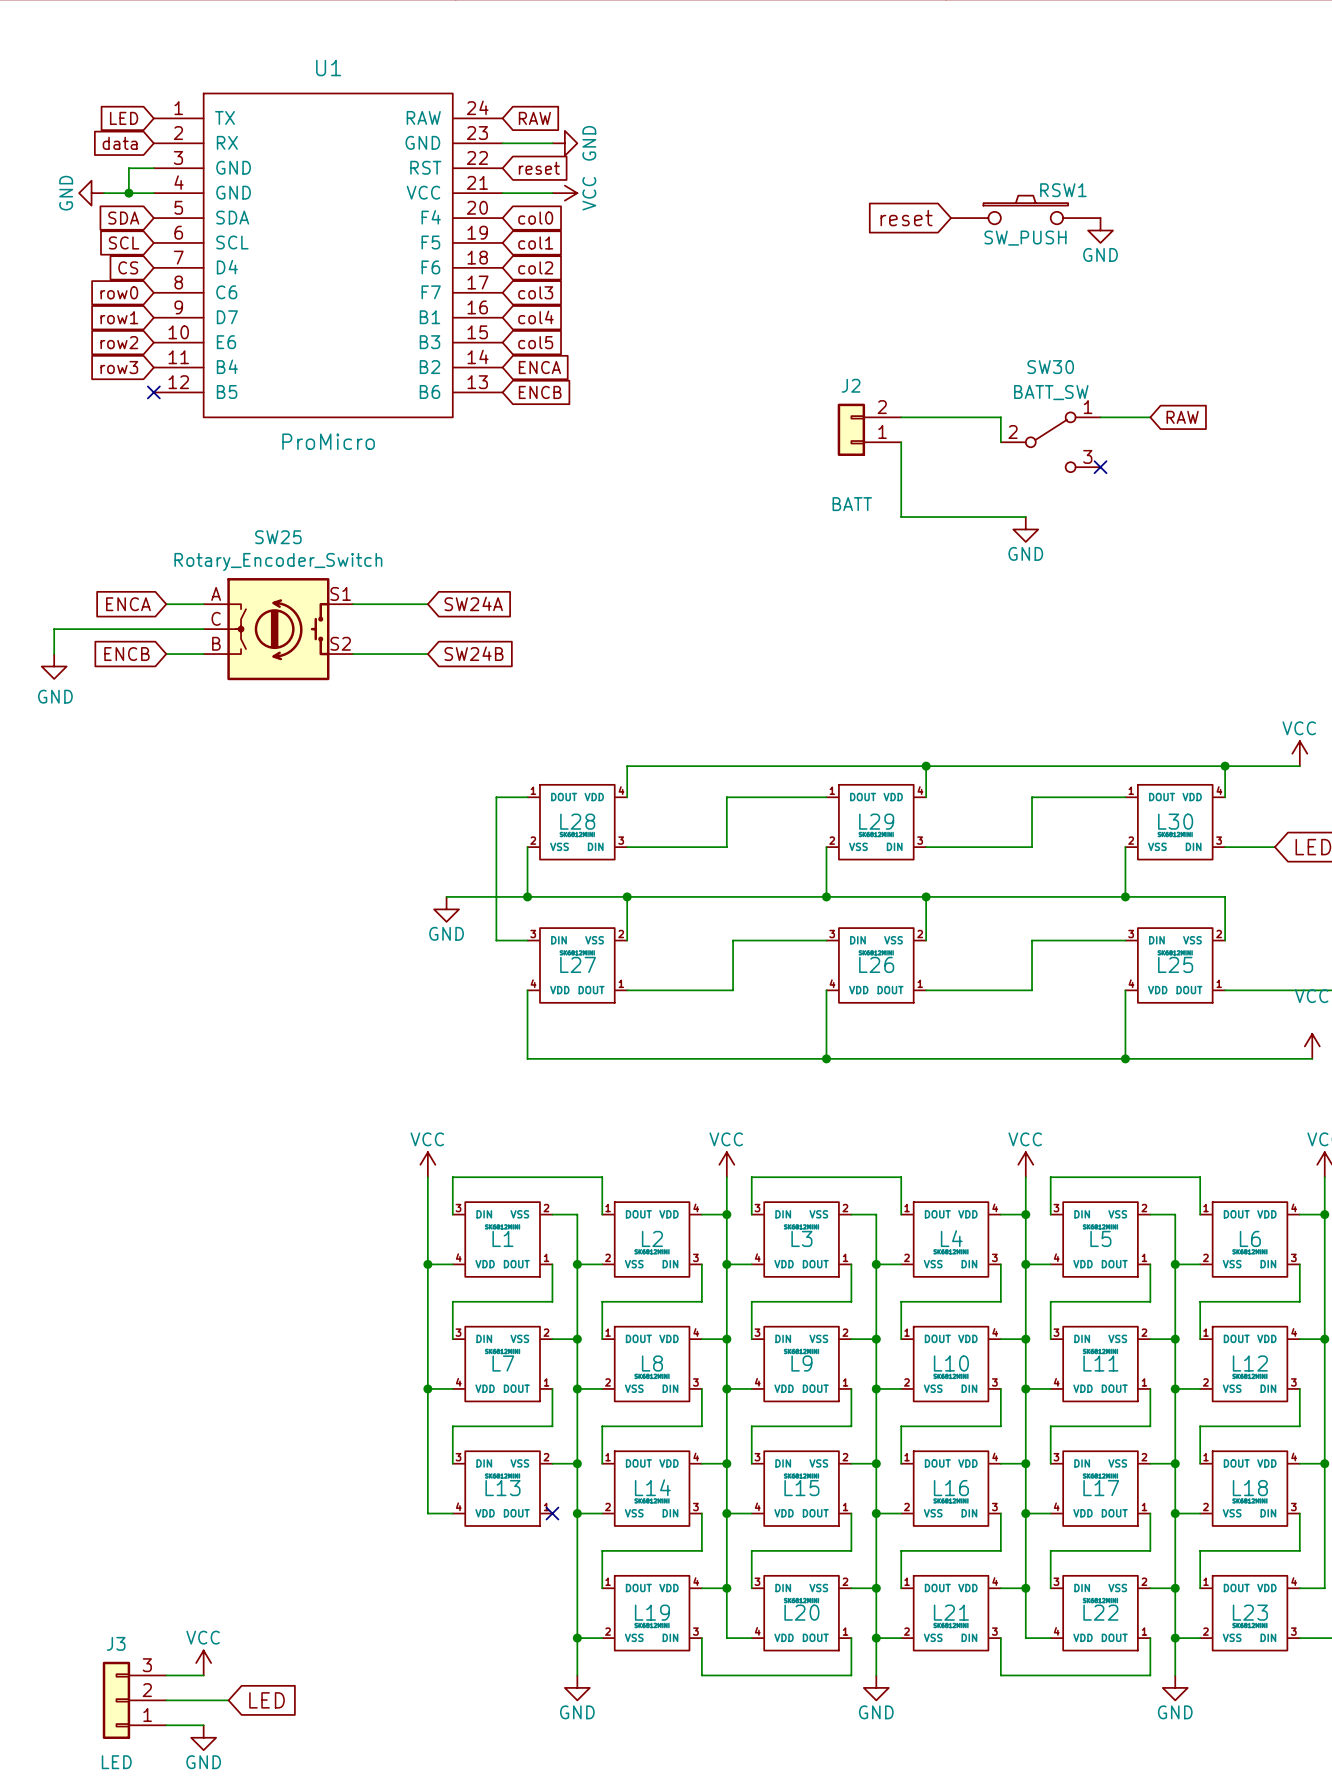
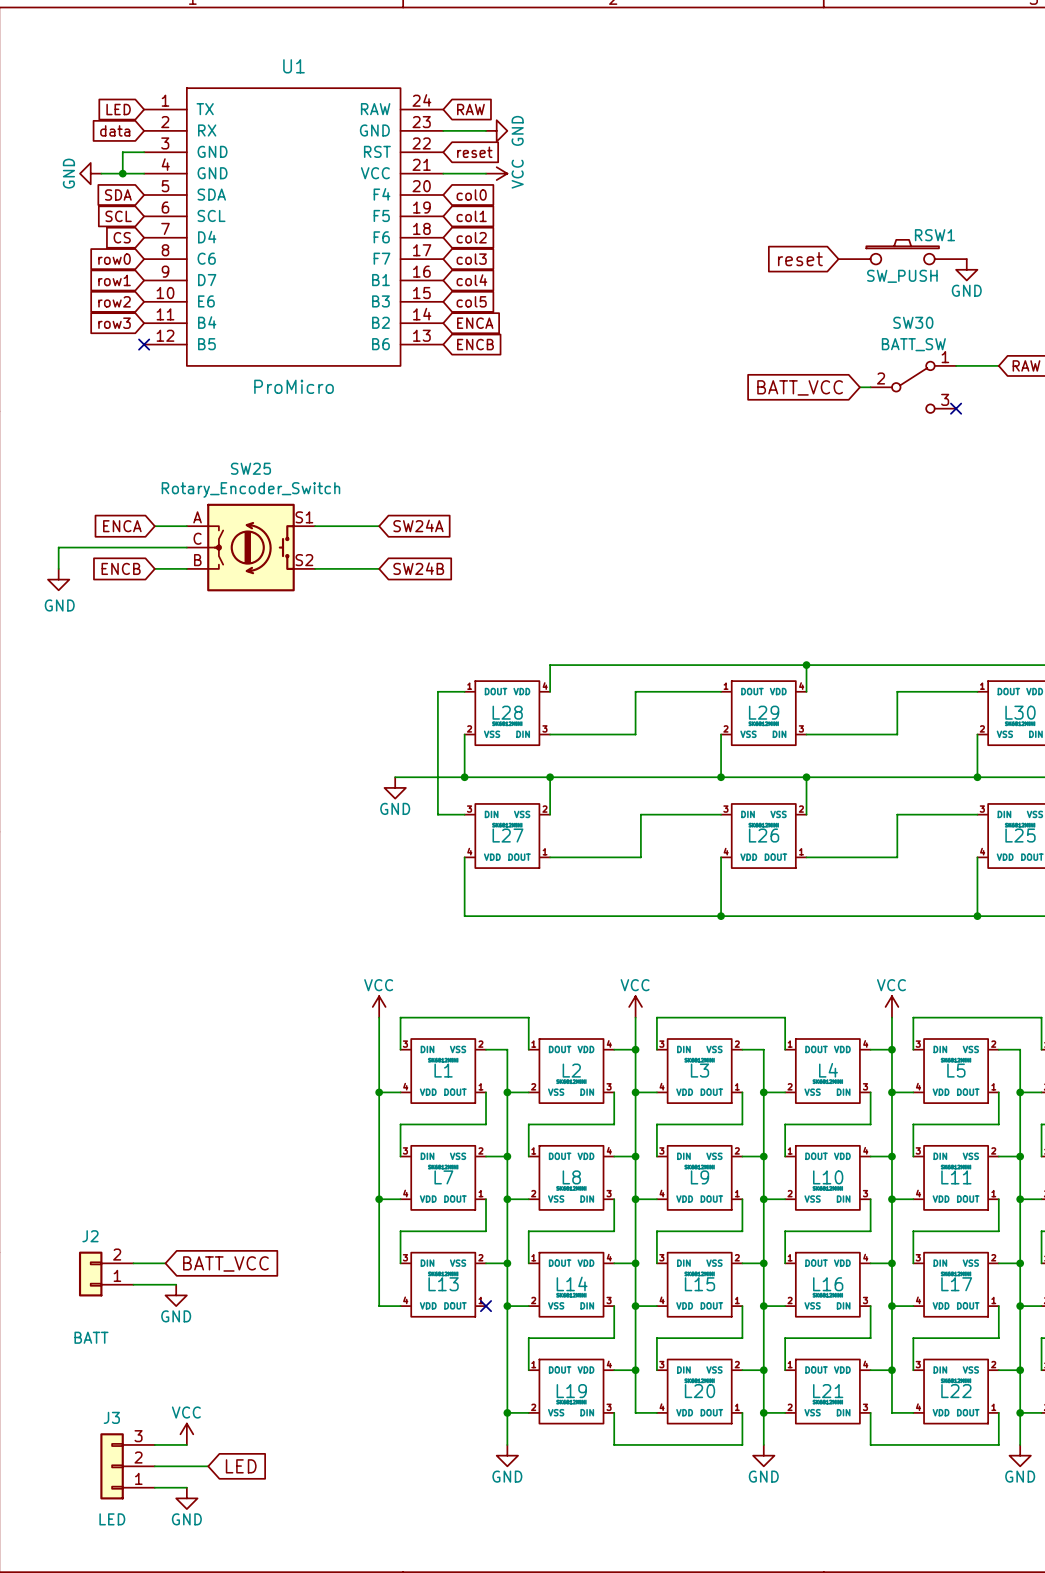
RSW1 position: (1025, 209) -> (902, 252)
global label position: reset (906, 218) -> reset (800, 259)
power symbol position: GND (1100, 230) -> GND (966, 269)
wire: (901, 417) (1000, 417) (1000, 442) -> (859, 387) (870, 387)
J2 position: (869, 429) -> (106, 1274)
wire: (901, 442) (901, 517) (1025, 517) -> none
global label: none -> BATT_VCC (800, 387)
power symbol: GND (1025, 529) -> none
wire: none -> (133, 1263) (165, 1263)
global label: none -> BATT_VCC (225, 1263)
wire: none -> (133, 1284) (176, 1284)
power symbol: none -> GND (176, 1295)

